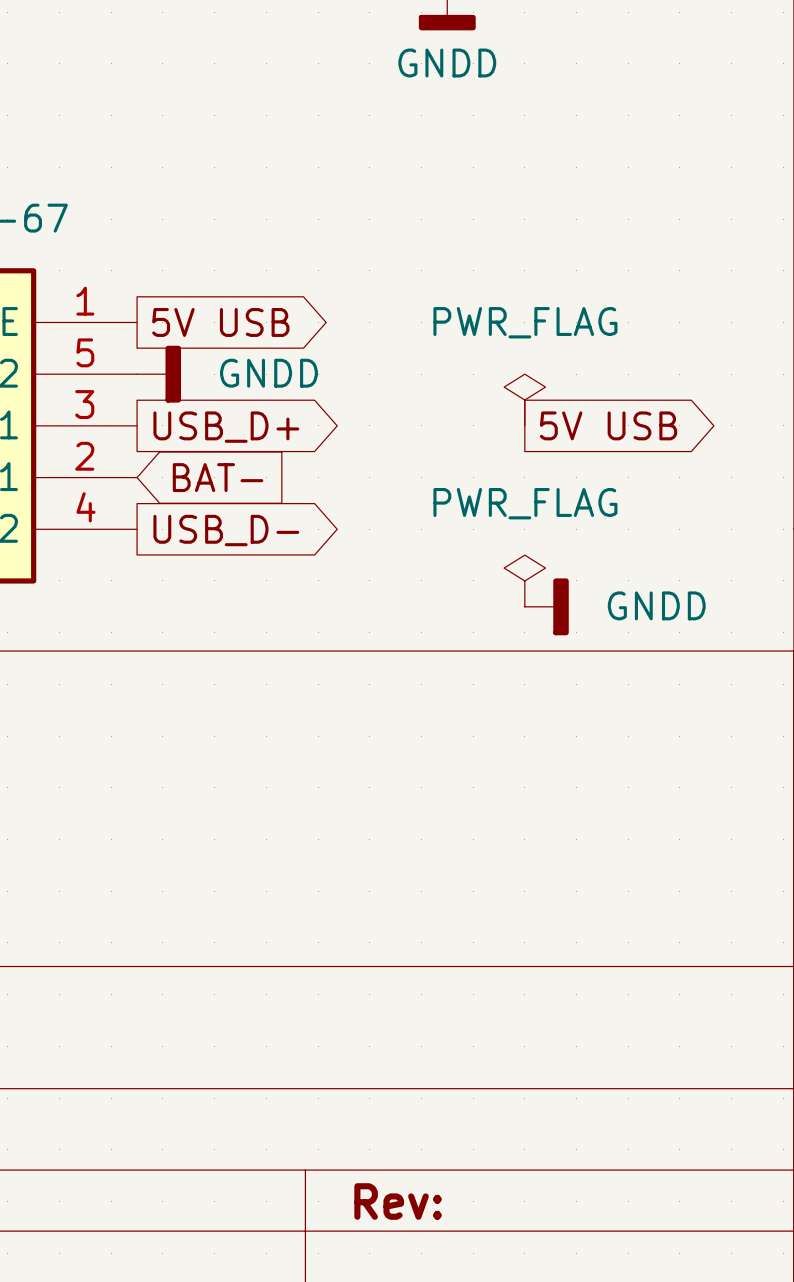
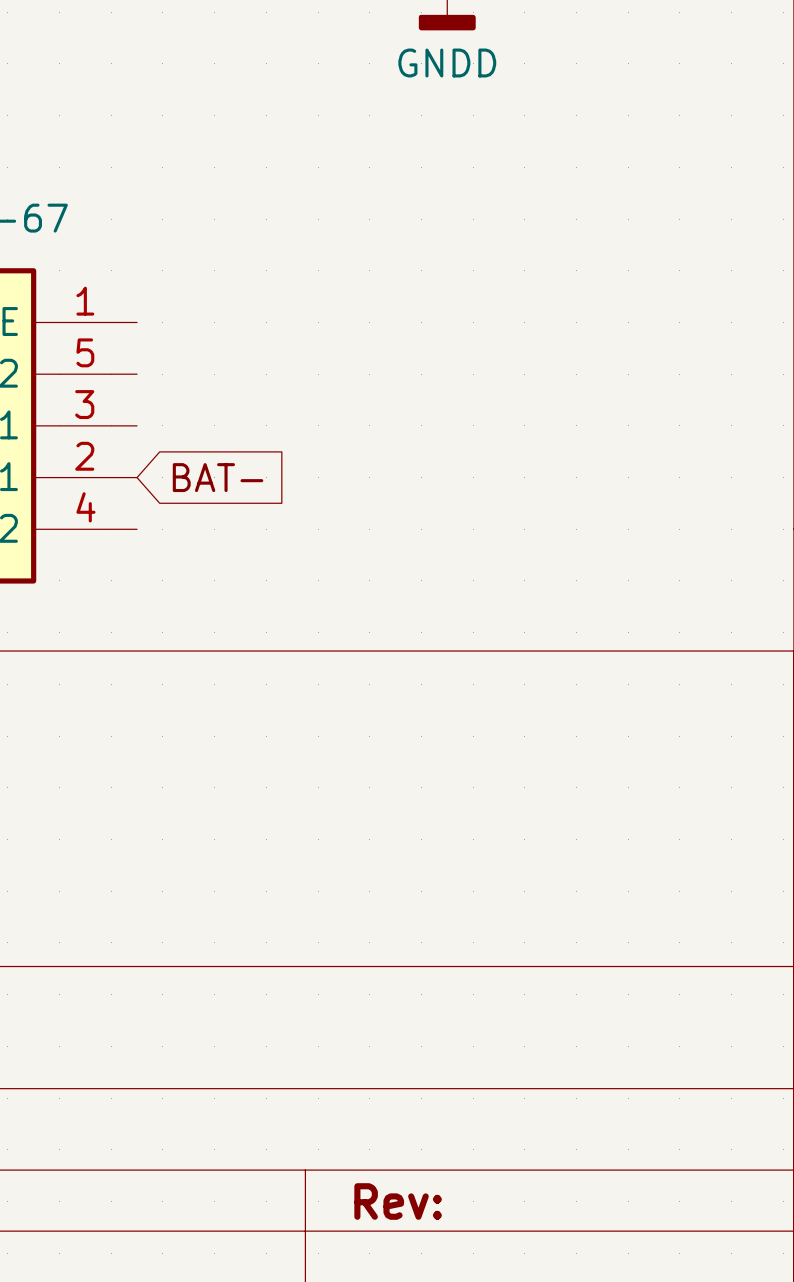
global label: 5V USB (220, 322) -> none
power symbol: GNDD (159, 374) -> none
power symbol: PWR_FLAG (524, 400) -> none
global label: 5V USB (608, 425) -> none
global label: USB_D+ (226, 427) -> none
global label: USB_D- (226, 530) -> none
power symbol: PWR_FLAG (524, 580) -> none
power symbol: GNDD (546, 606) -> none

